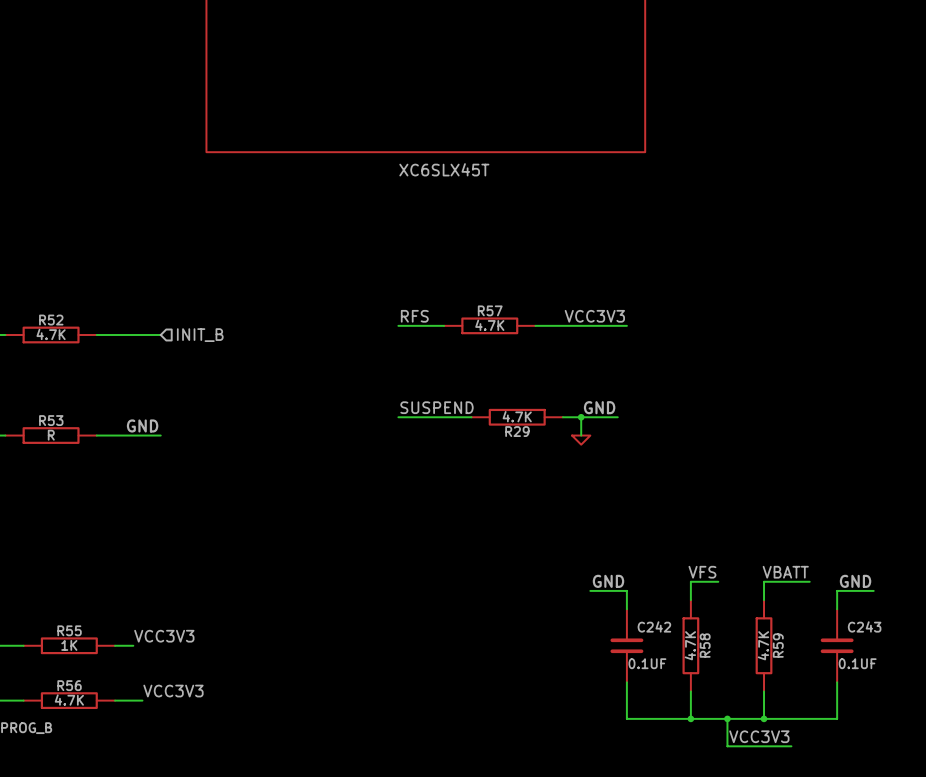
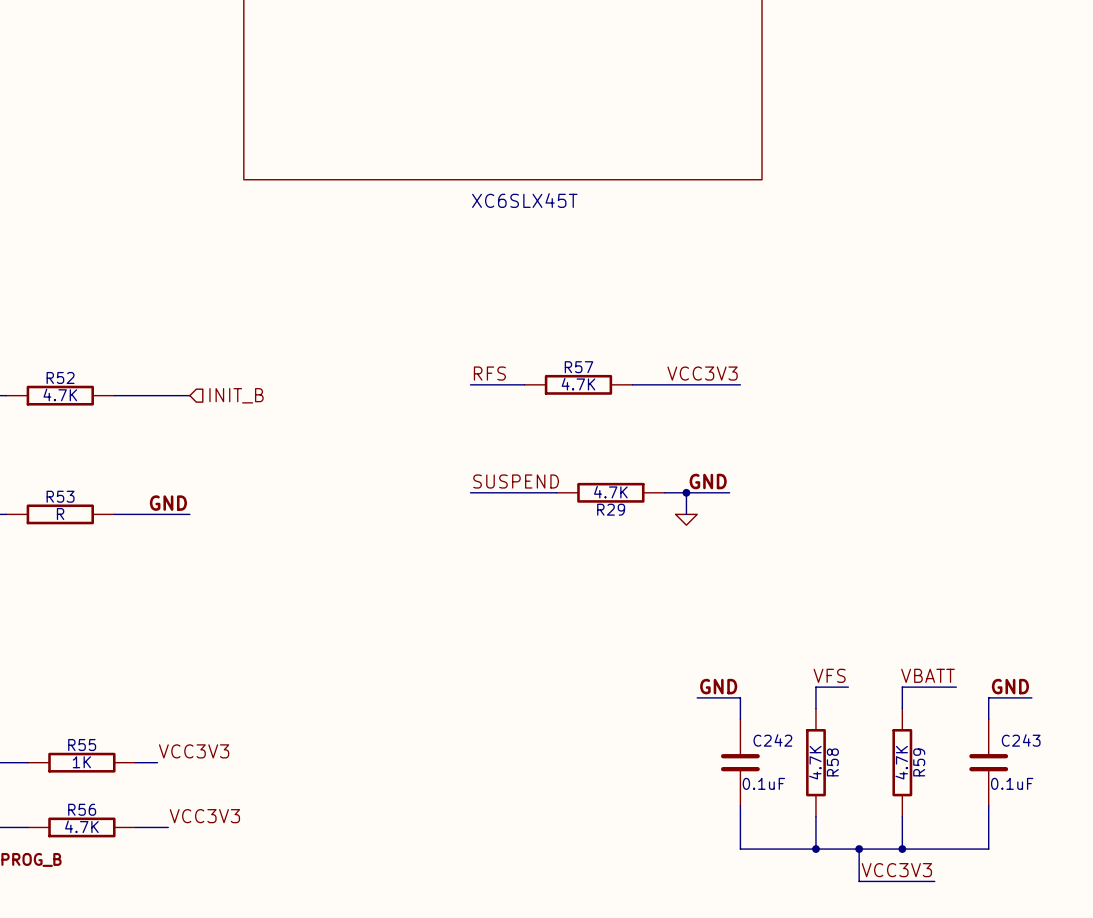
C242 value: 0.1UF (647, 663) -> 0.1uF (763, 783)
C243 value: 0.1UF (857, 663) -> 0.1uF (1012, 783)

